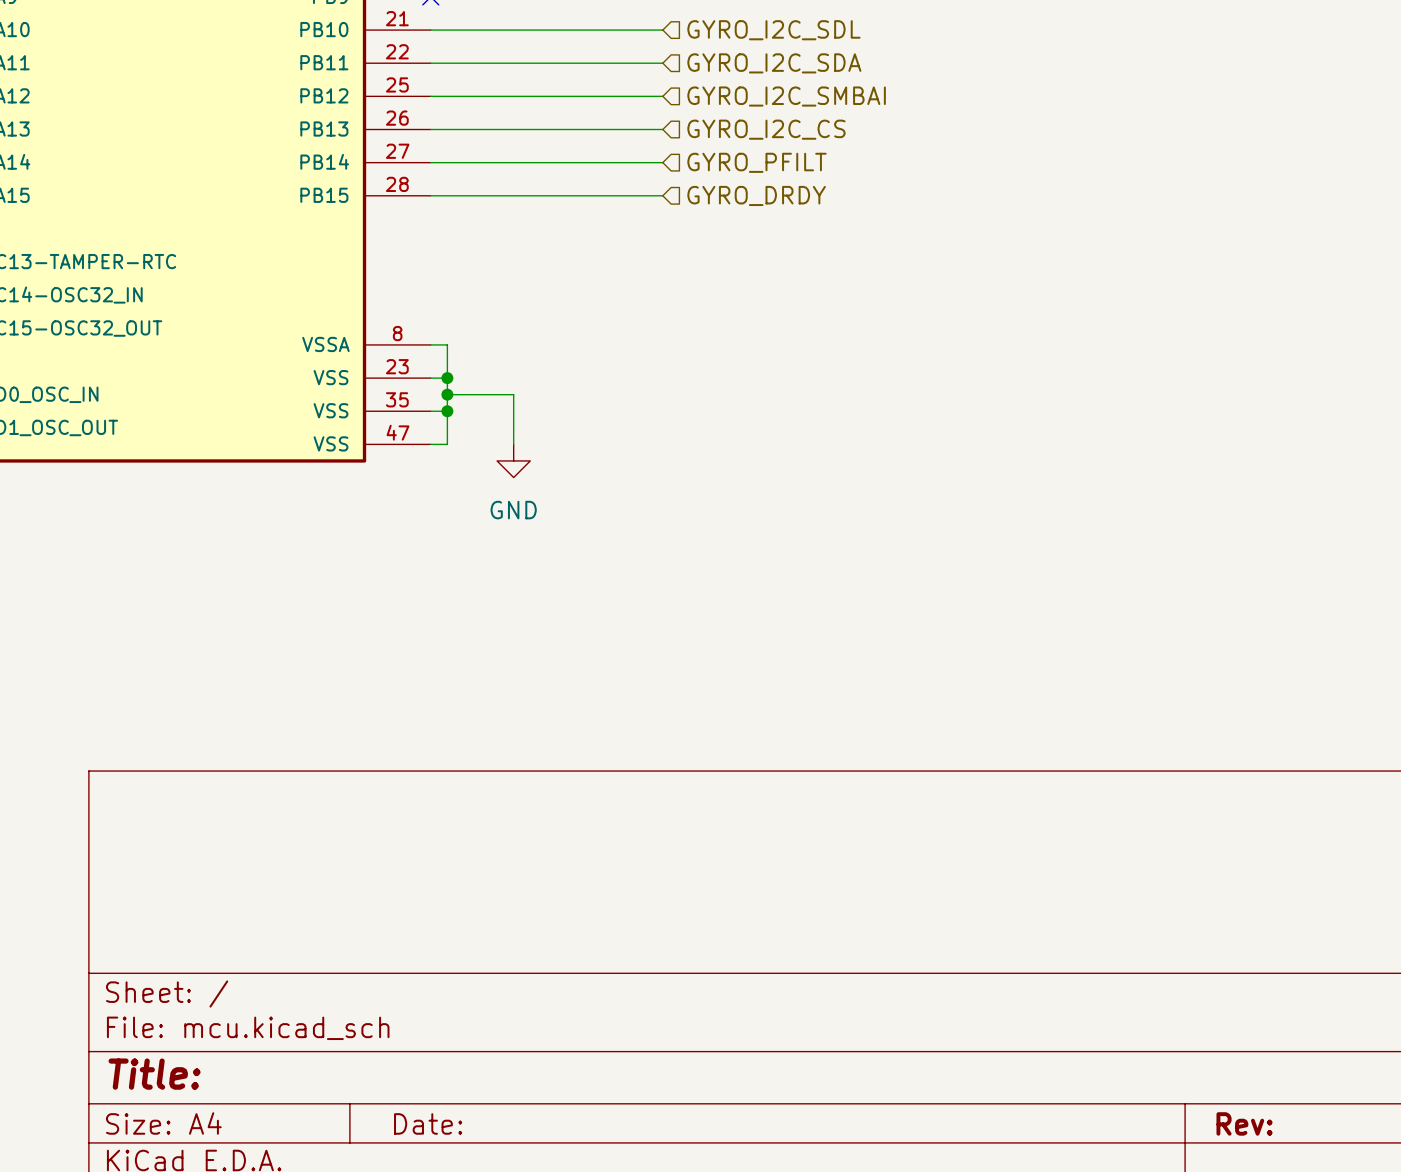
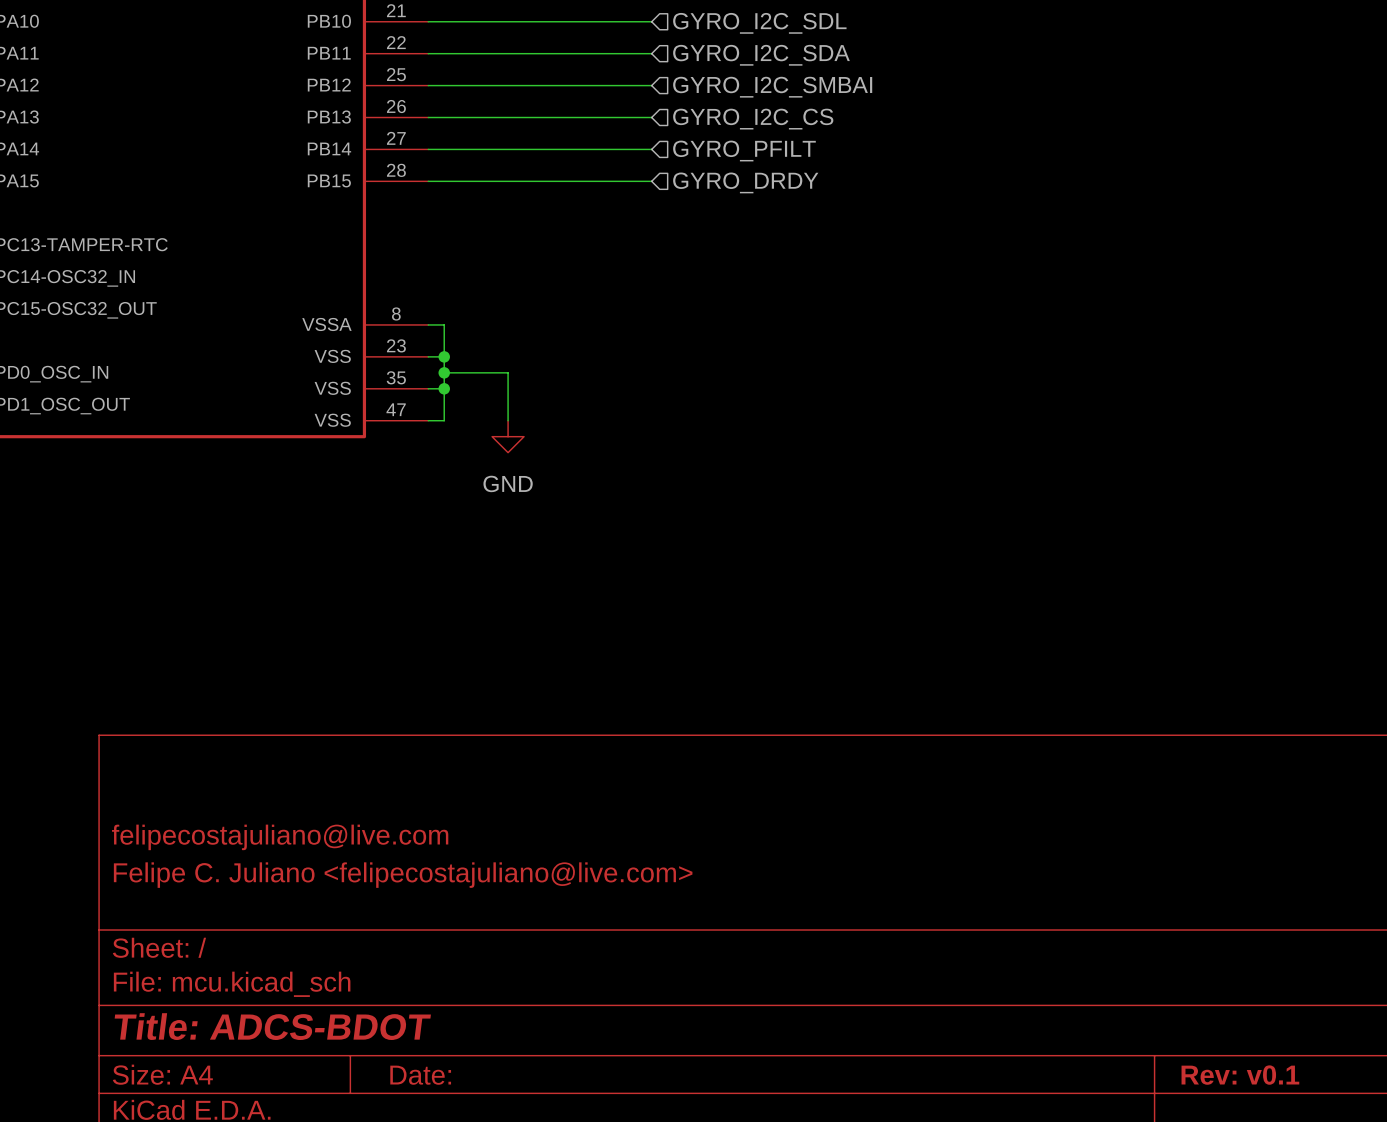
title block: none -> felipecostajuliano@live.com (280, 837)
title block: none -> Felipe C. Juliano <felipecostajuliano@live.com> (403, 875)
title block: Title: (154, 1074) -> Title: ADCS-BDOT (272, 1026)
title block: Rev: (1244, 1123) -> Rev: v0.1 (1240, 1075)

